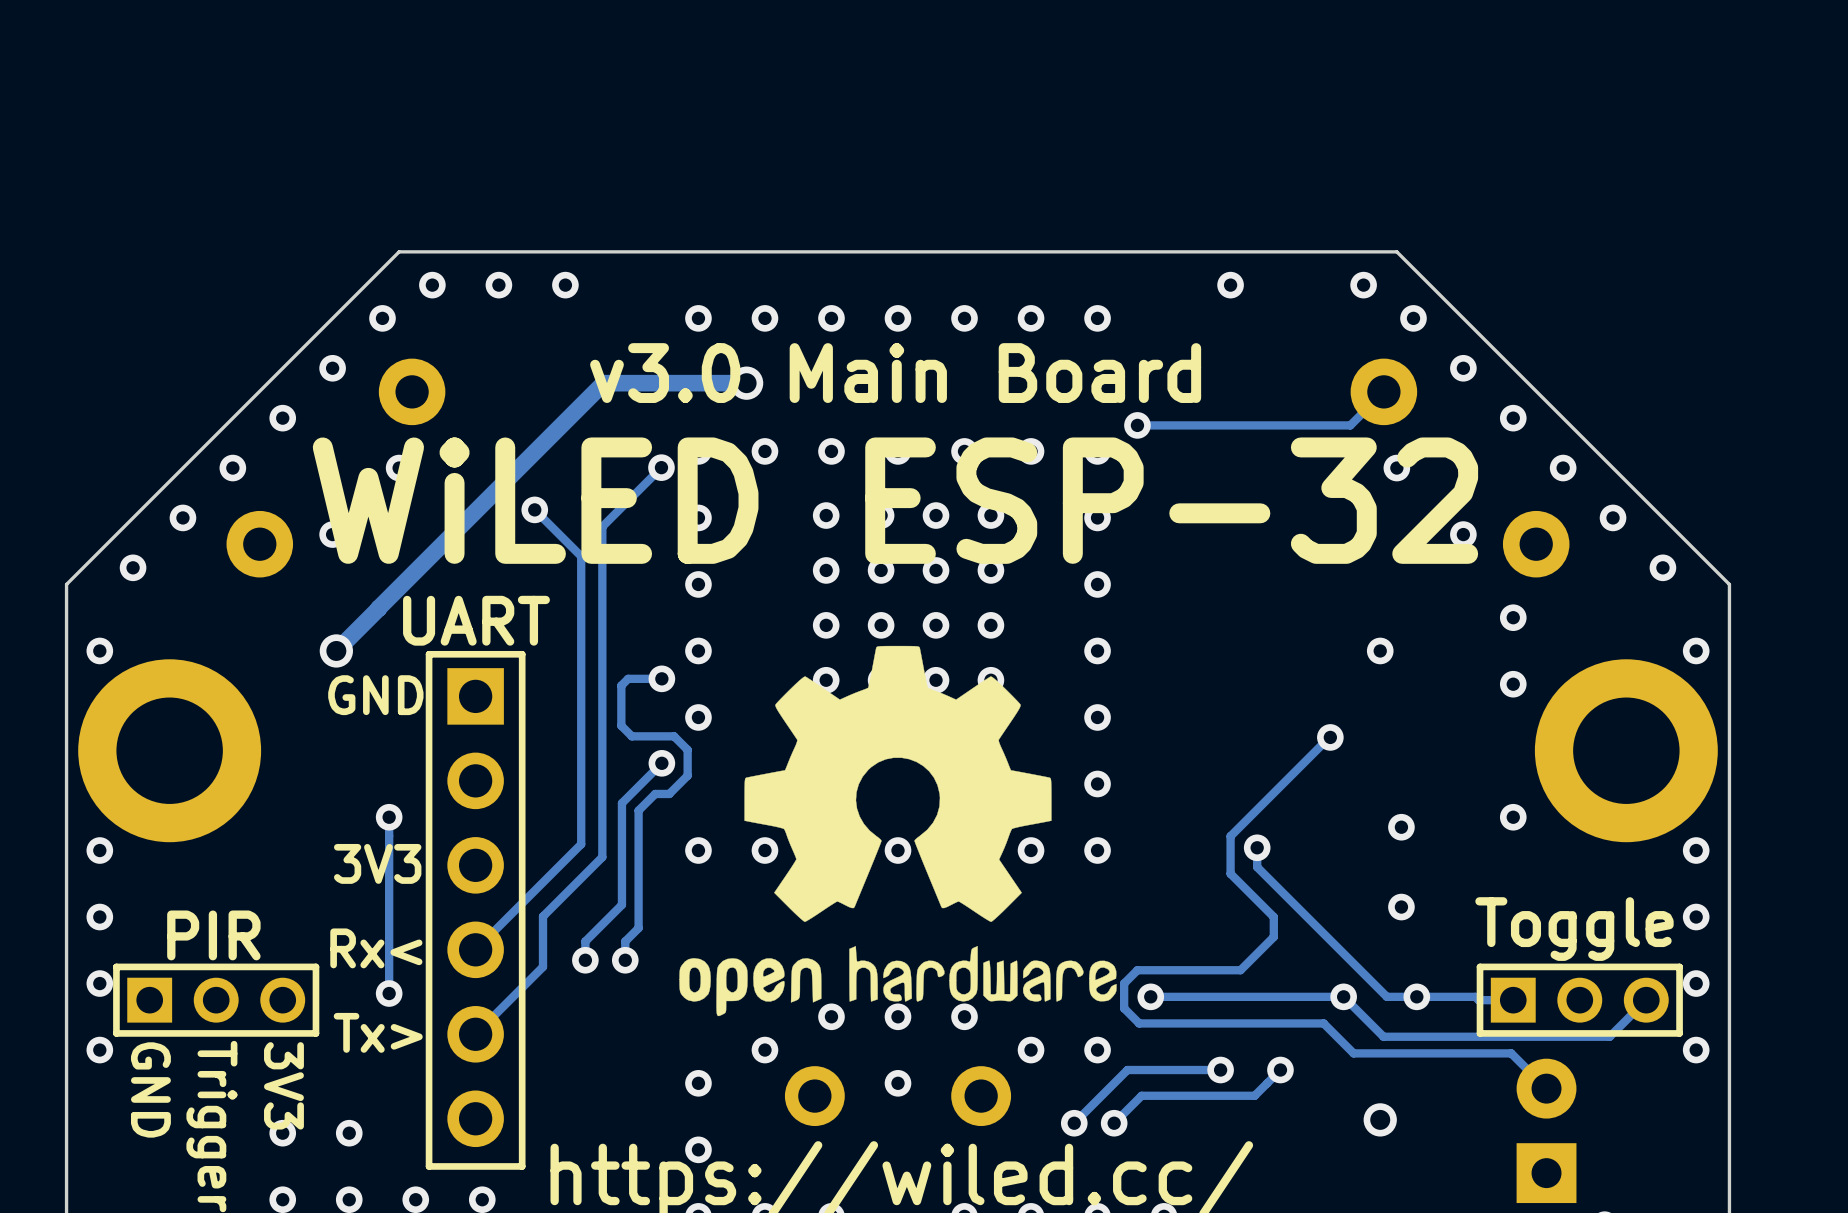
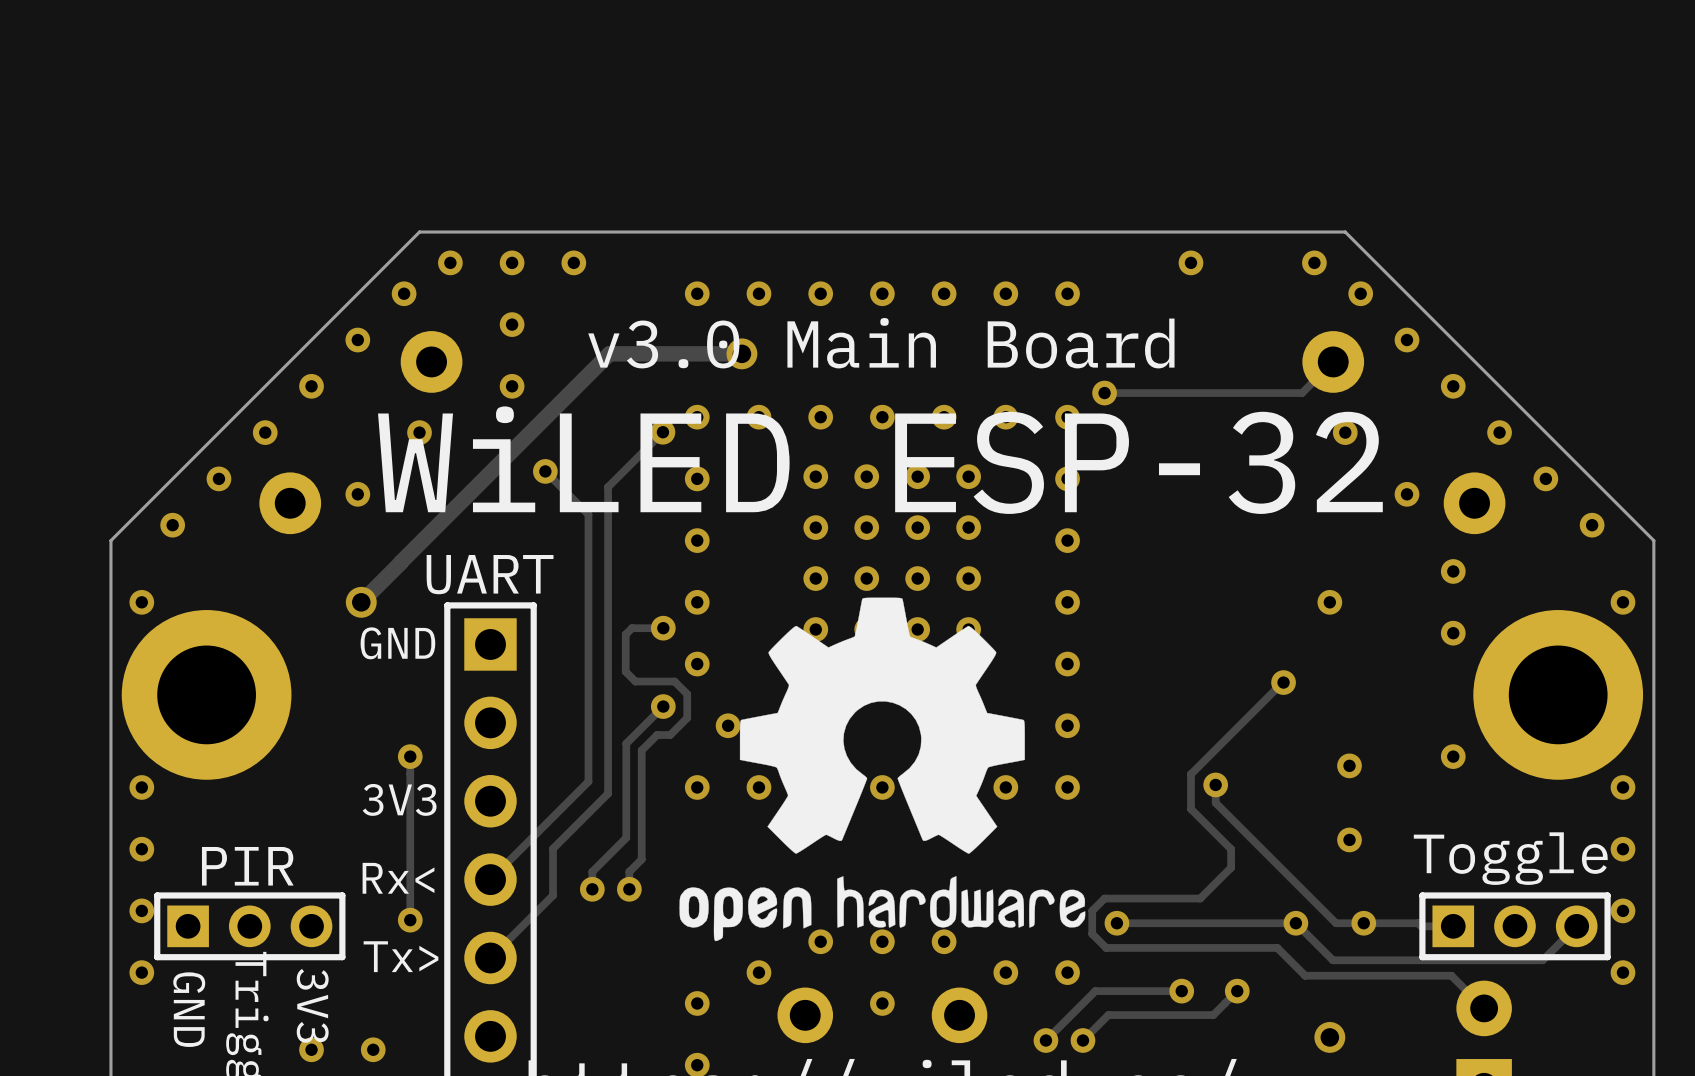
via: none -> (512, 324)
via: none -> (512, 386)
via: none -> (728, 725)

